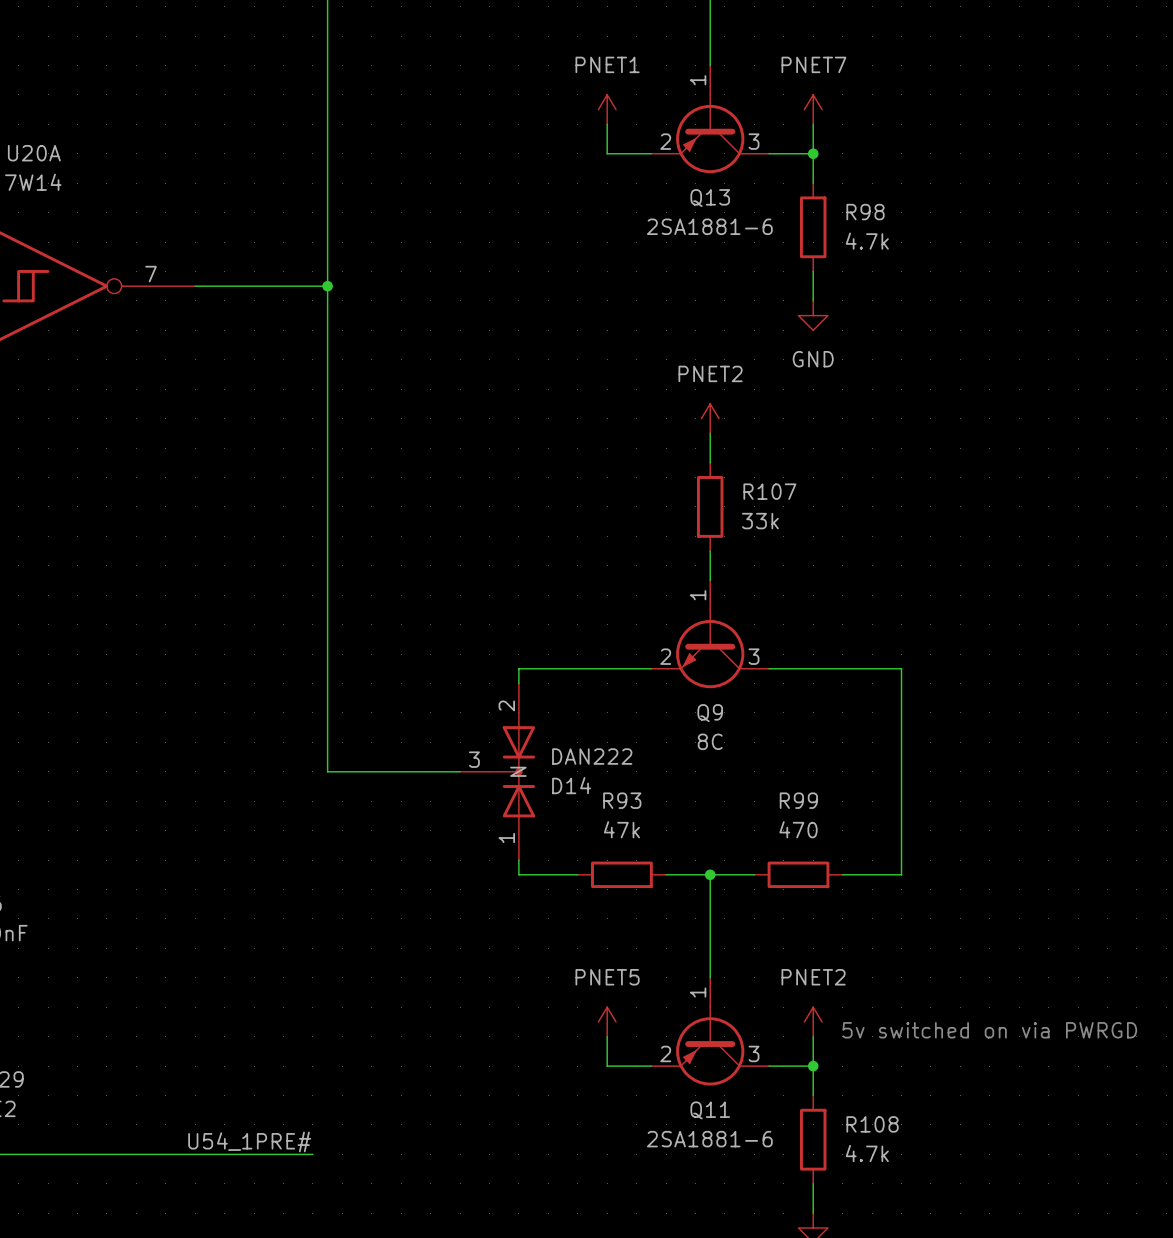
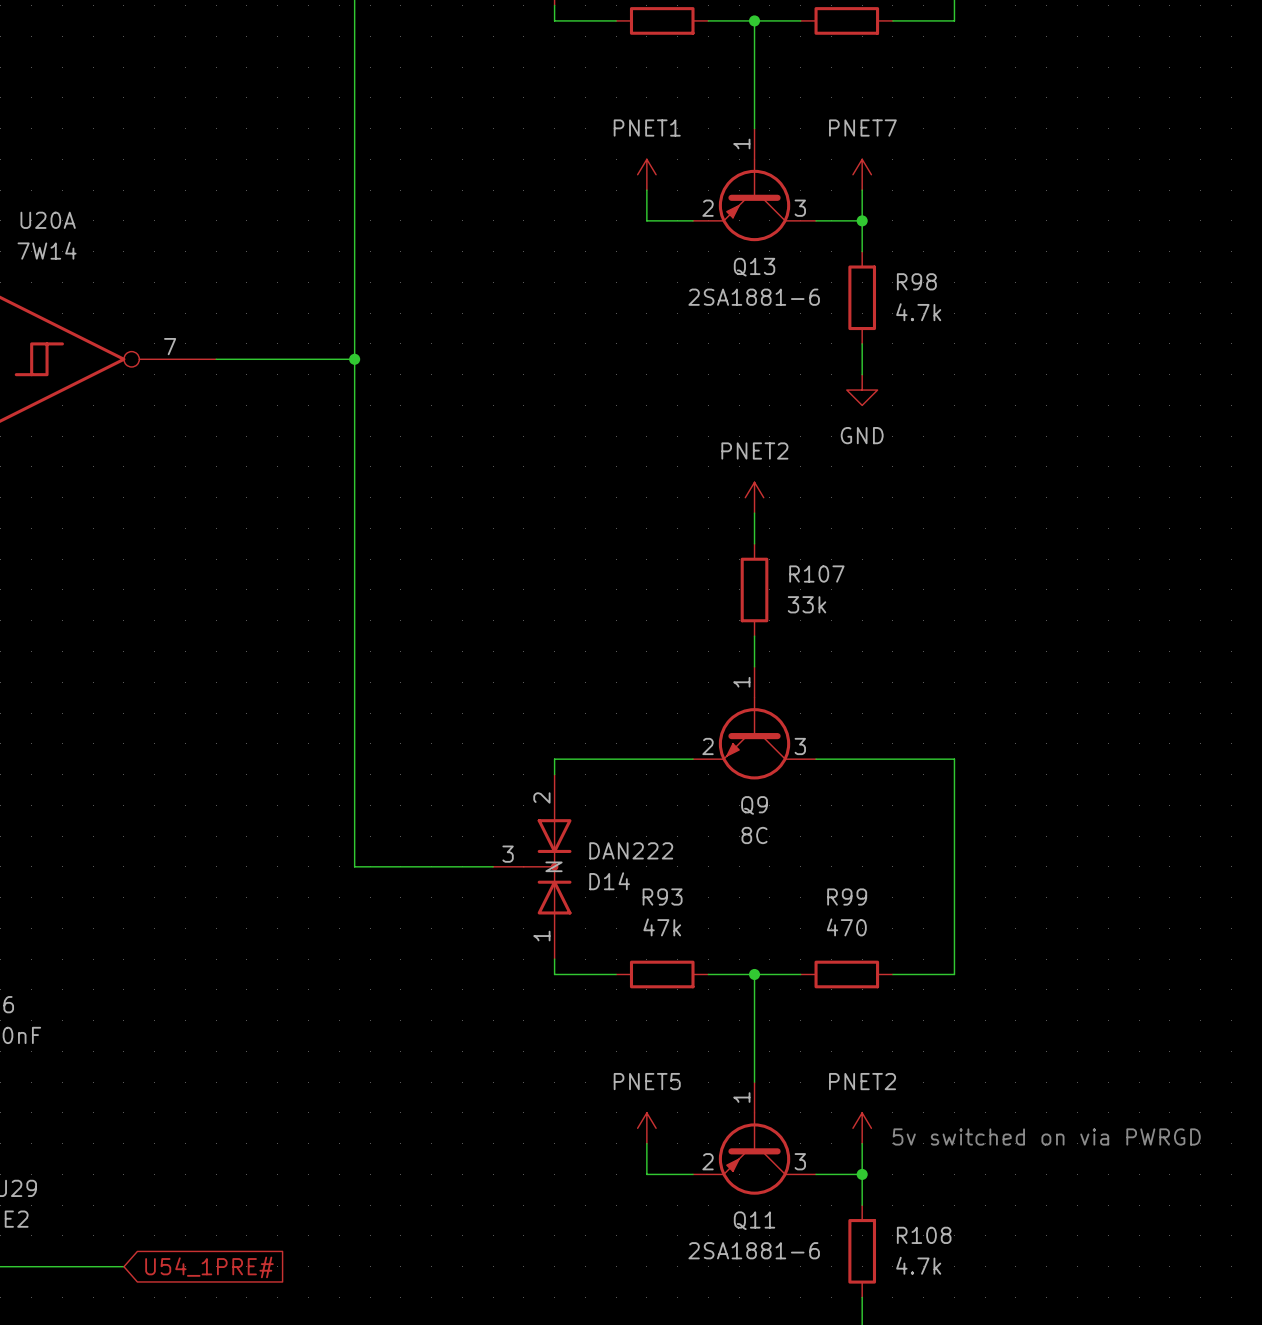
label: U54_1PRE# (249, 1141) -> none
wire: (106, 1154) (312, 1154) -> none
global label: none -> U54_1PRE# (209, 1267)

